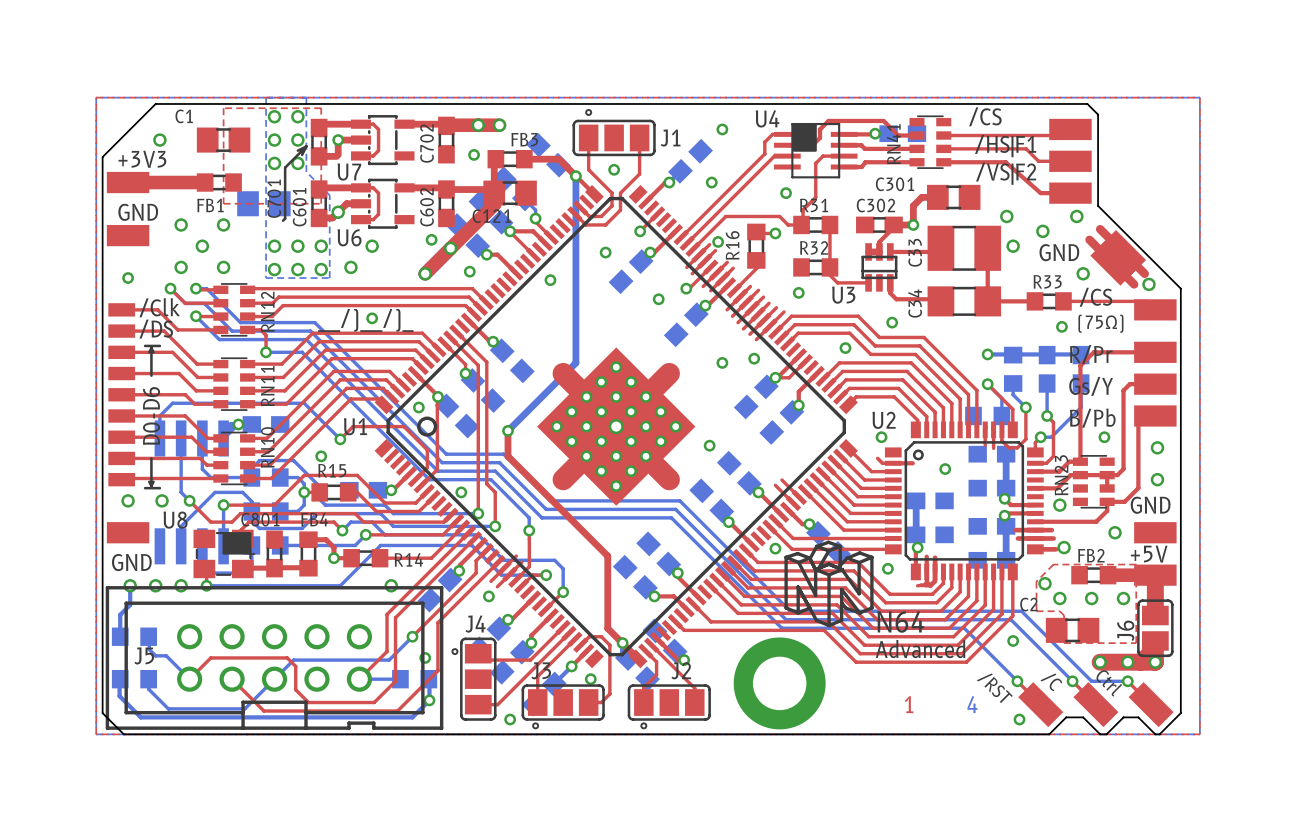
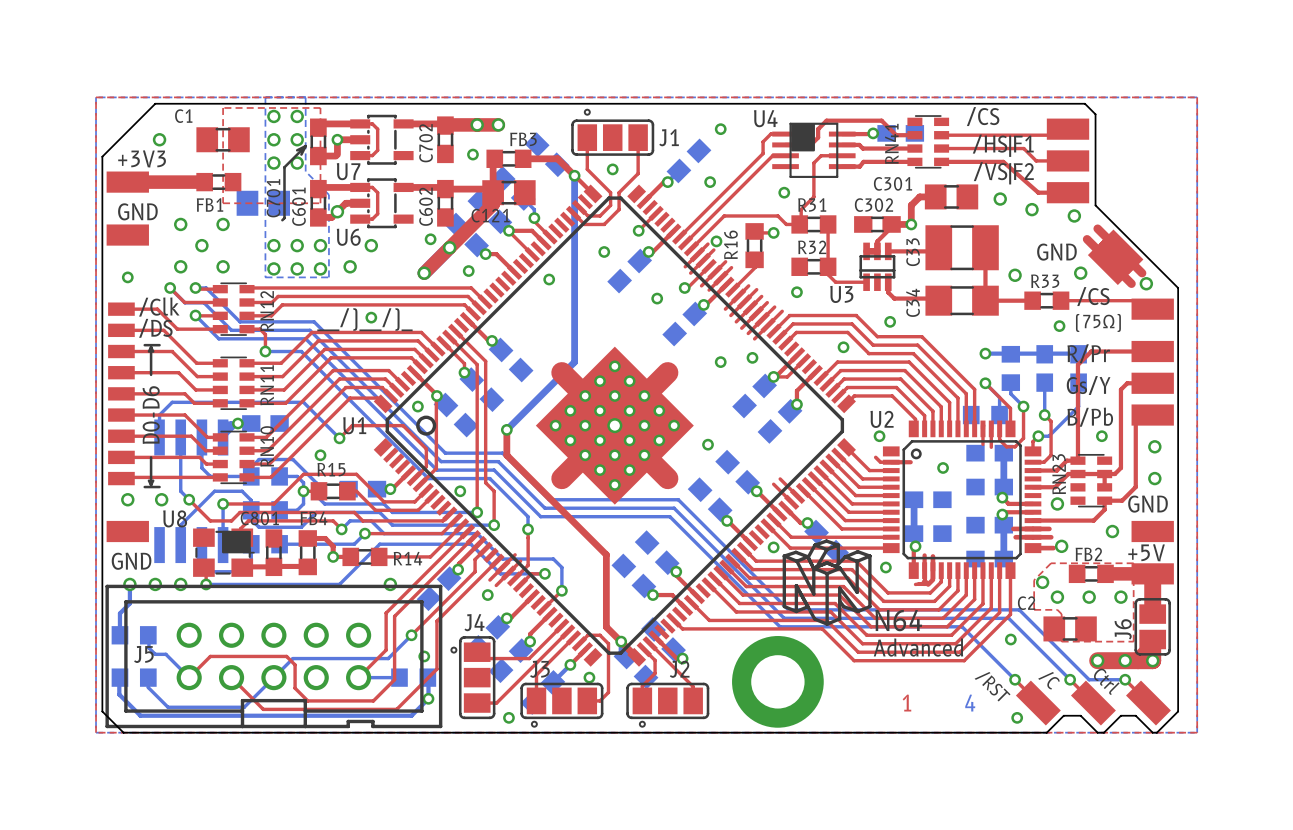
via: none -> (1000, 199)
via: none -> (1032, 209)
via: (1006, 216) -> none
via: (1042, 231) -> none
via: (1013, 246) -> none
via: none -> (1015, 275)

